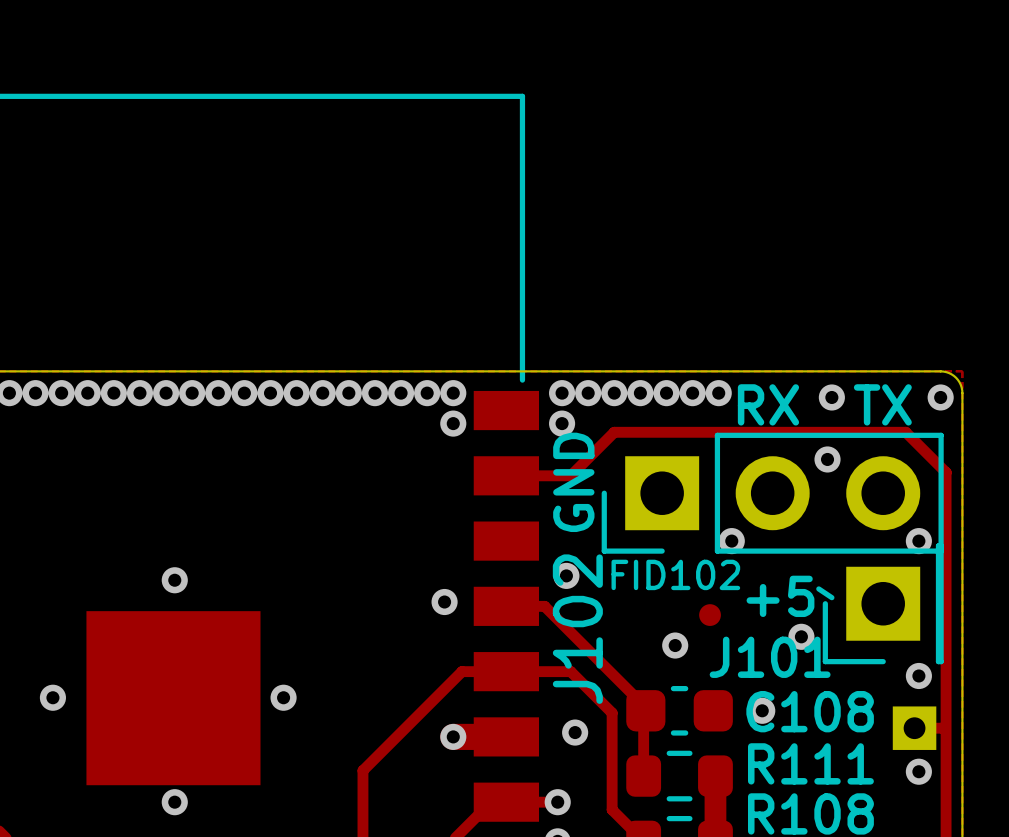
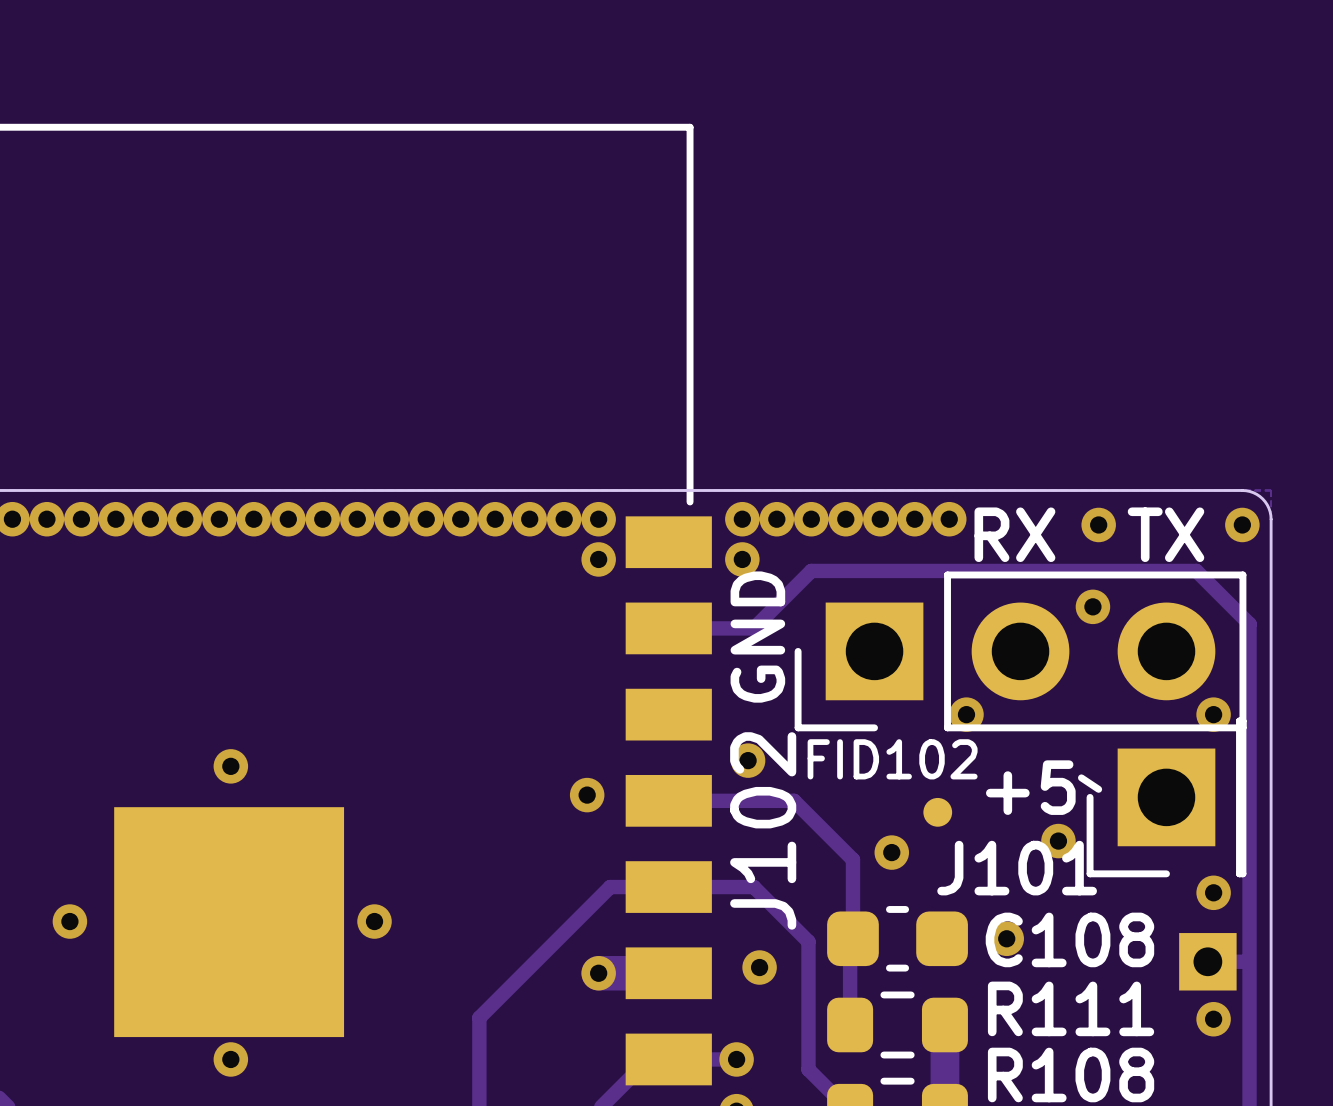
track: (544, 606) (645, 707) -> (719, 800) (794, 800) (852, 859) (852, 934)

